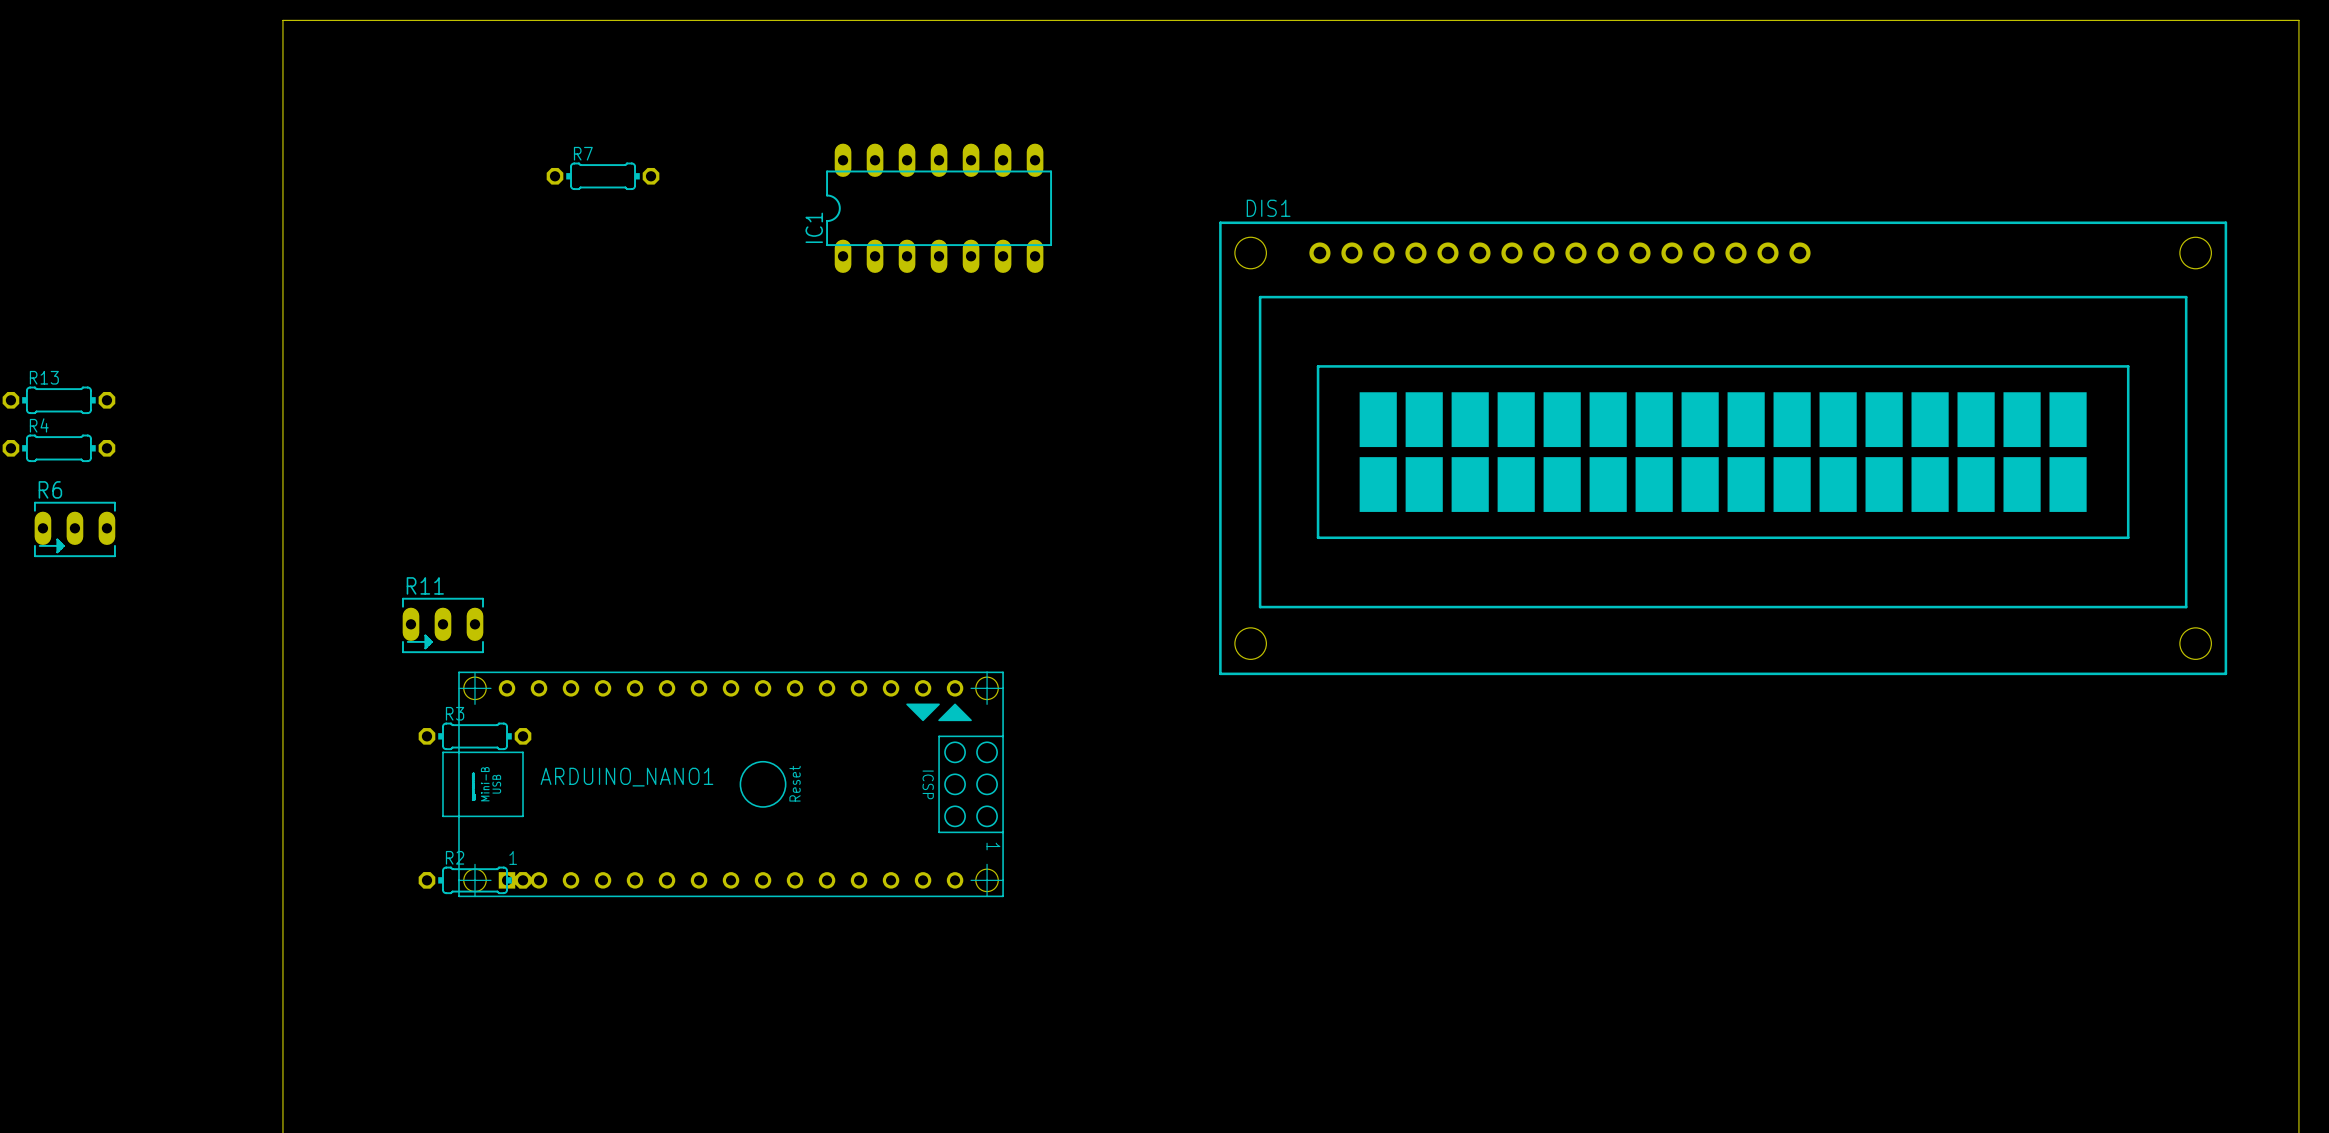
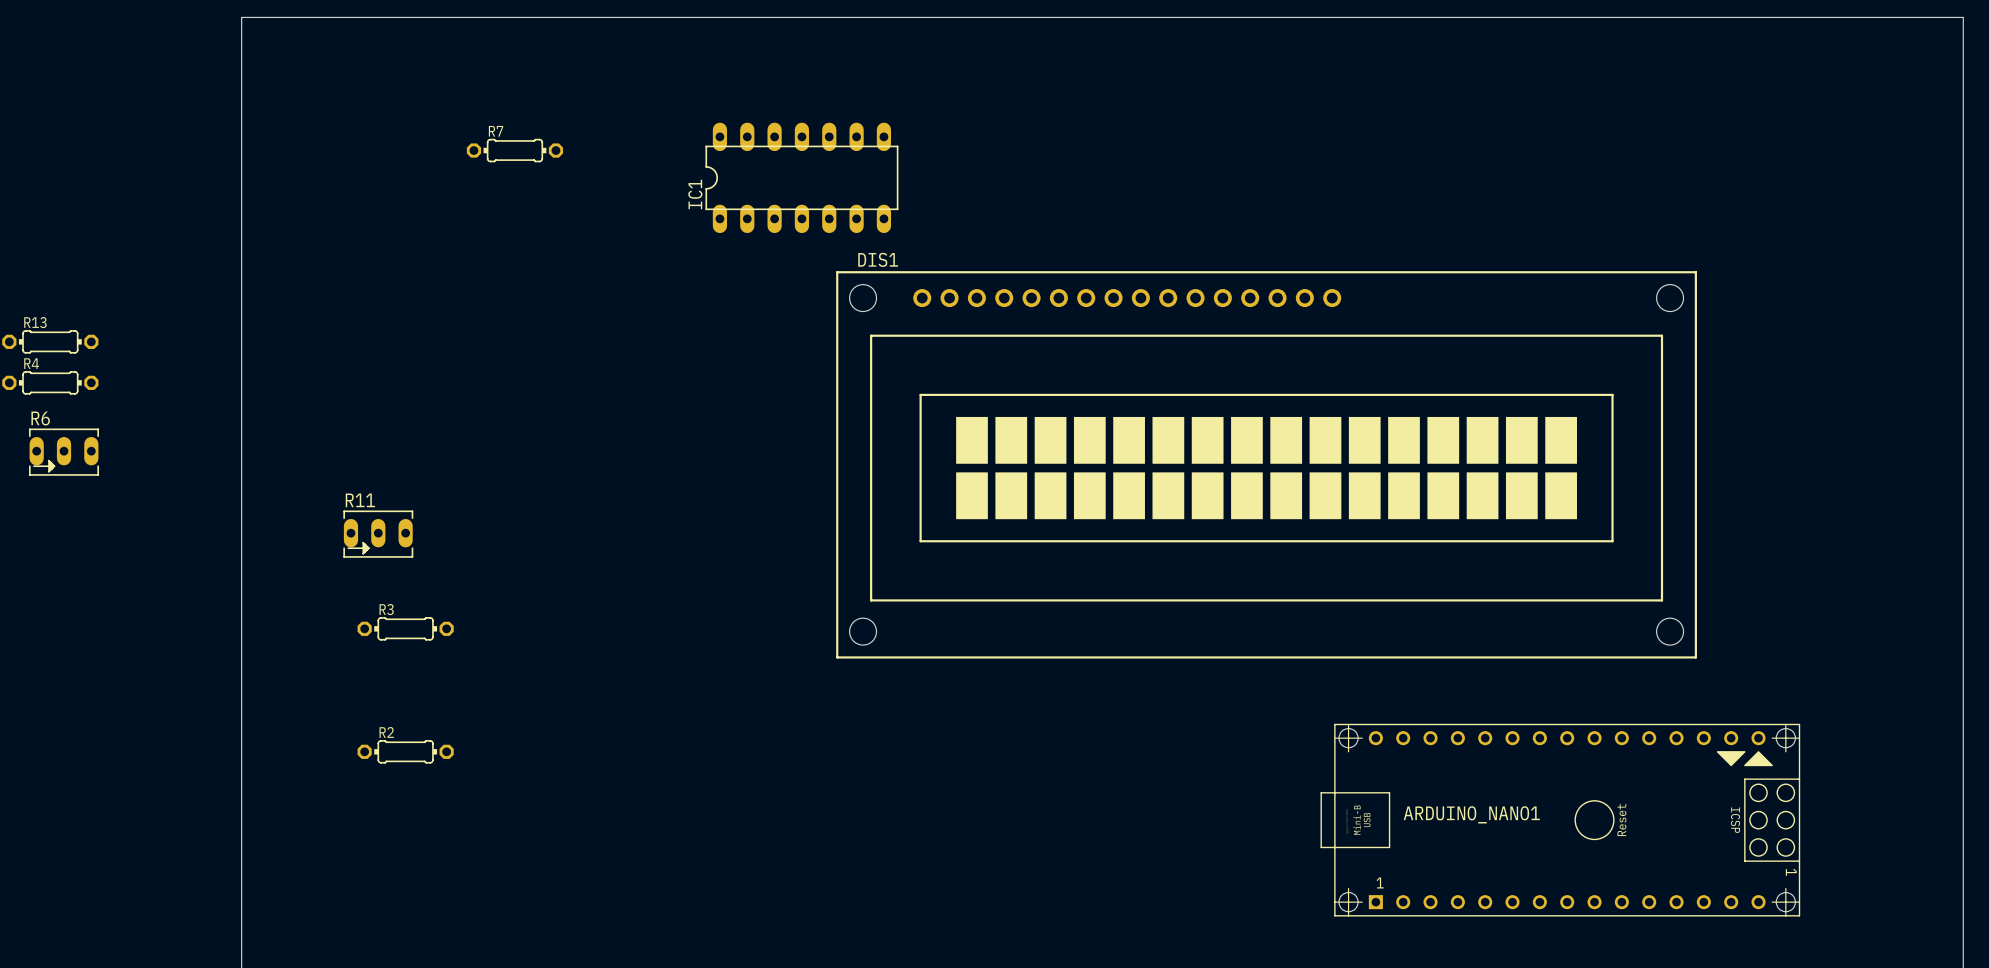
DIS1 position: (1723, 448) -> (1266, 464)
ARDUINO_NANO1 position: (723, 784) -> (1560, 820)

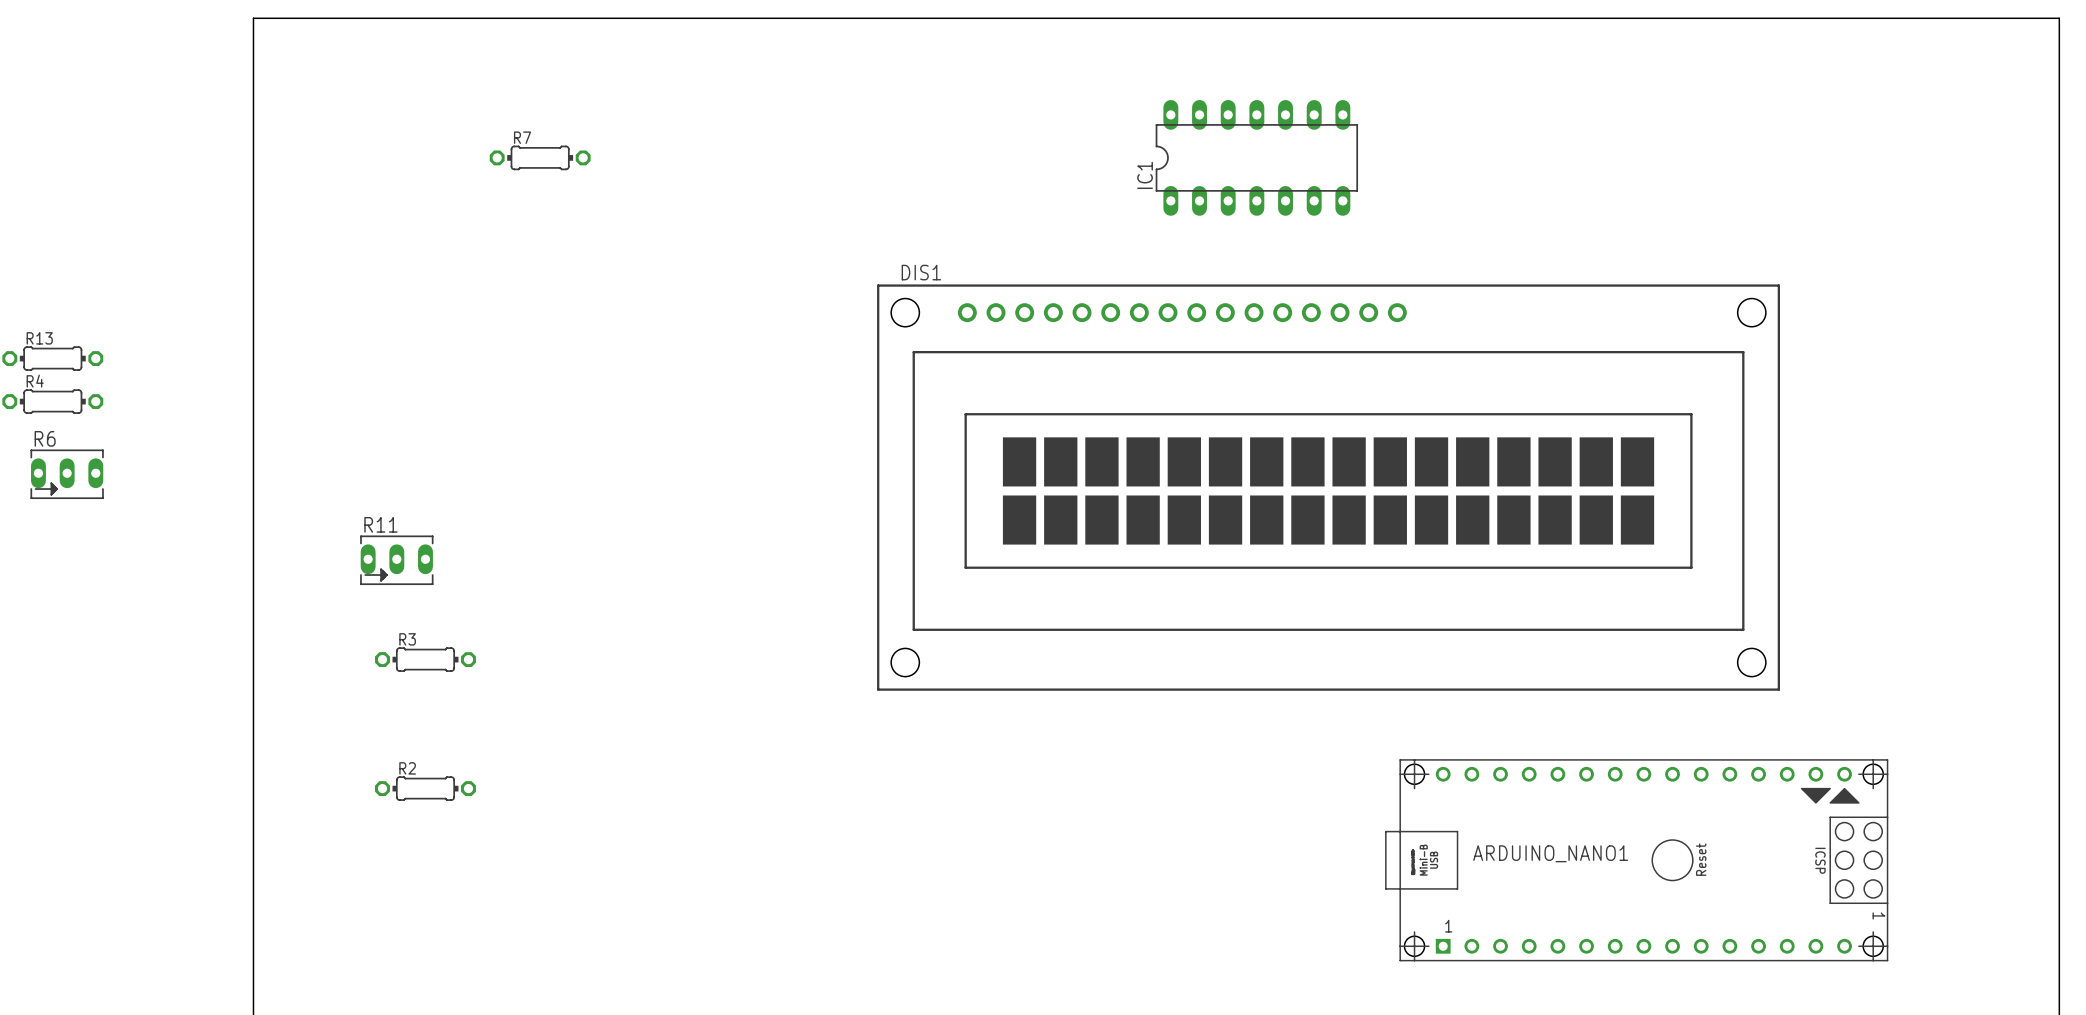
IC1 position: (801, 177) -> (1256, 157)

